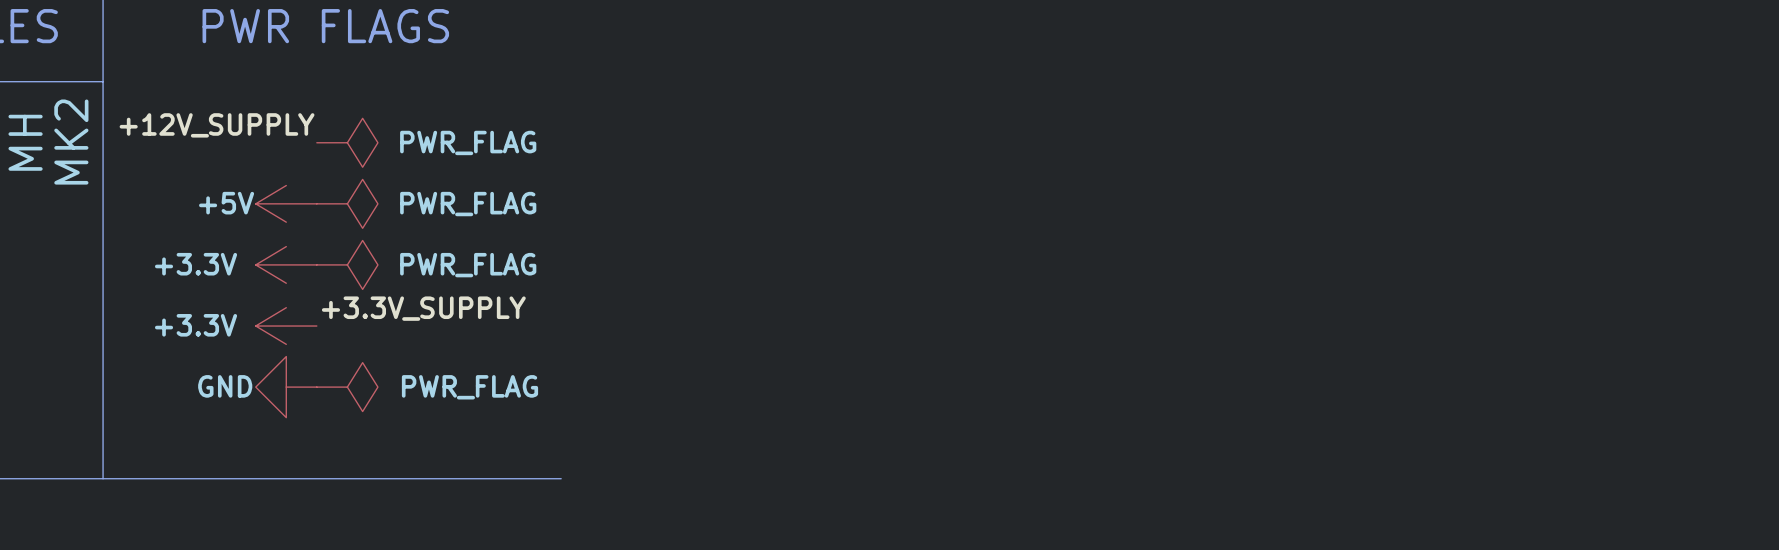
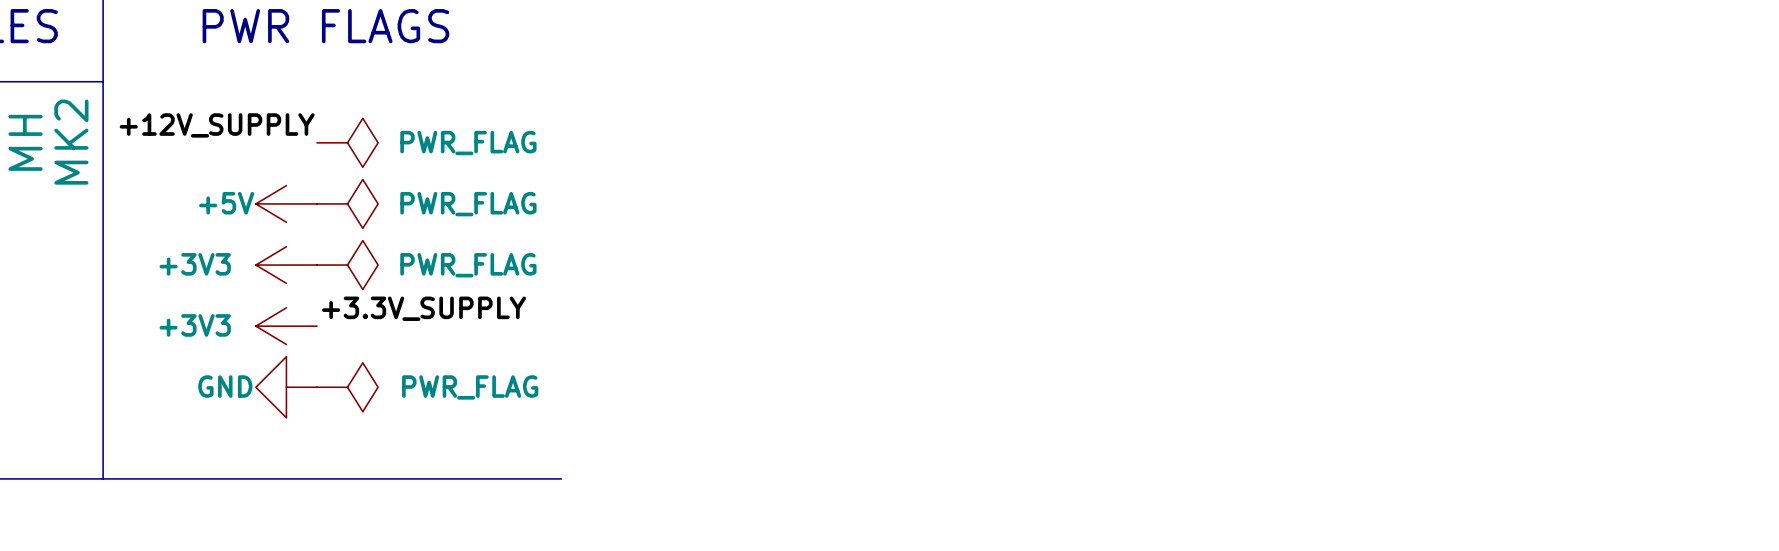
power symbol: +3.3V (286, 264) -> +3V3 (286, 265)
power symbol: +3.3V (286, 326) -> +3V3 (286, 326)

